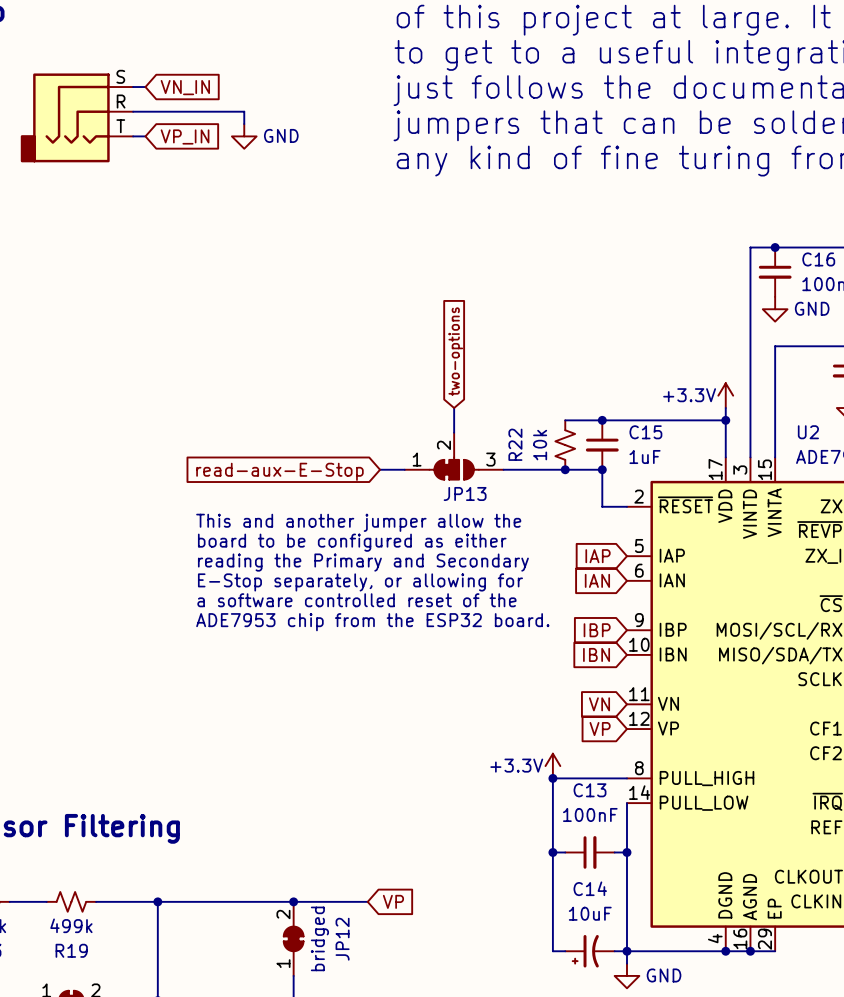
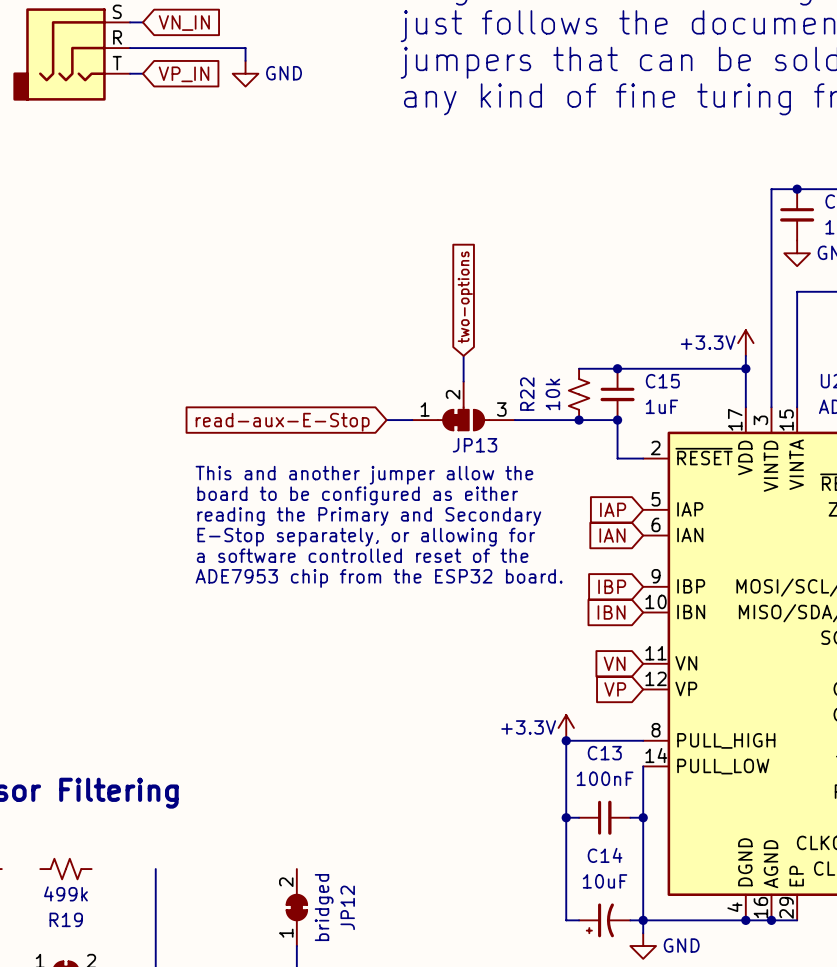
wire: (9, 901) (46, 901) -> none
wire: (96, 901) (367, 901) -> none
junction: (157, 901) -> none
junction: (293, 901) -> none
global label: VP (393, 901) -> none

